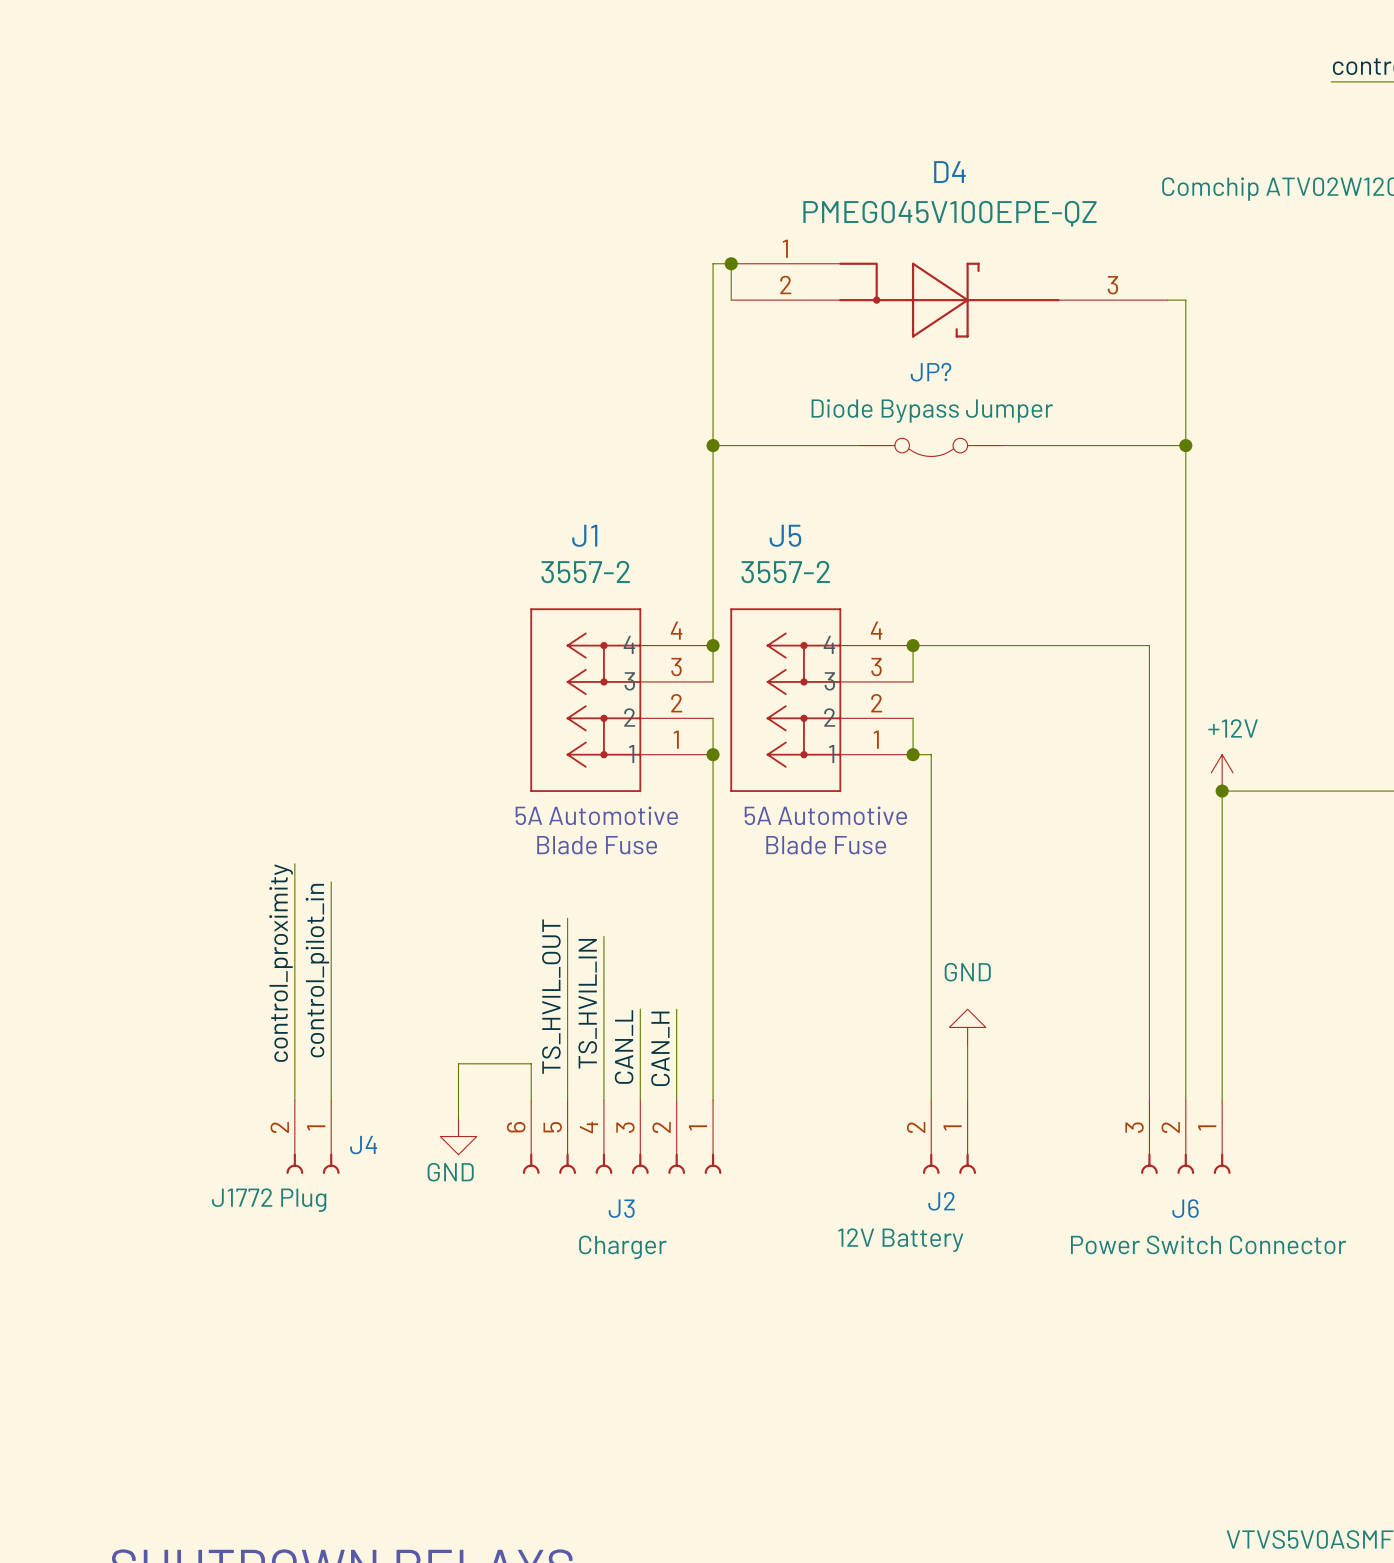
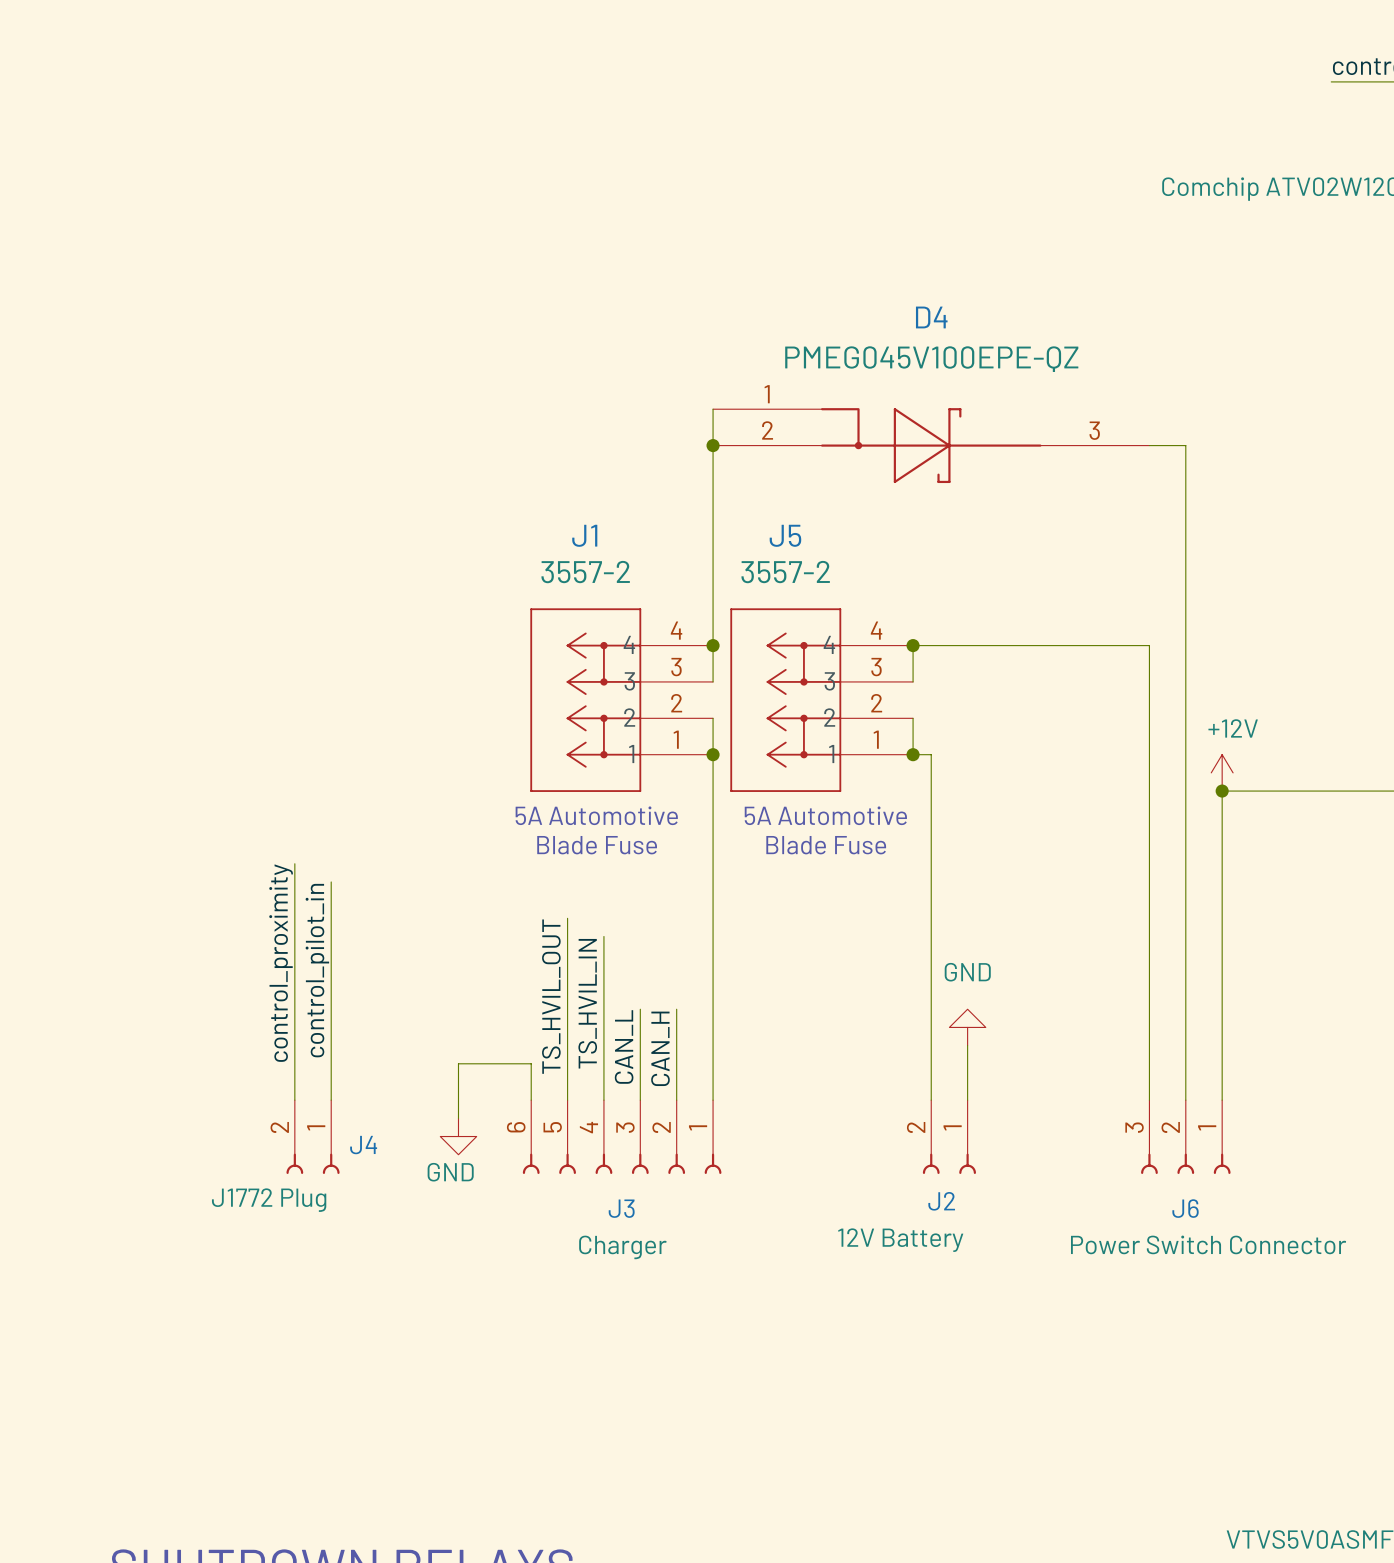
junction: (731, 263) -> none
wire: (731, 300) (731, 263) (713, 263) (713, 409) -> none
D4 position: (949, 300) -> (931, 445)
wire: (1167, 300) (1185, 300) (1185, 445) -> none
junction: (1185, 445) -> none
JP?: Diode Bypass Jumper (931, 447) -> none

